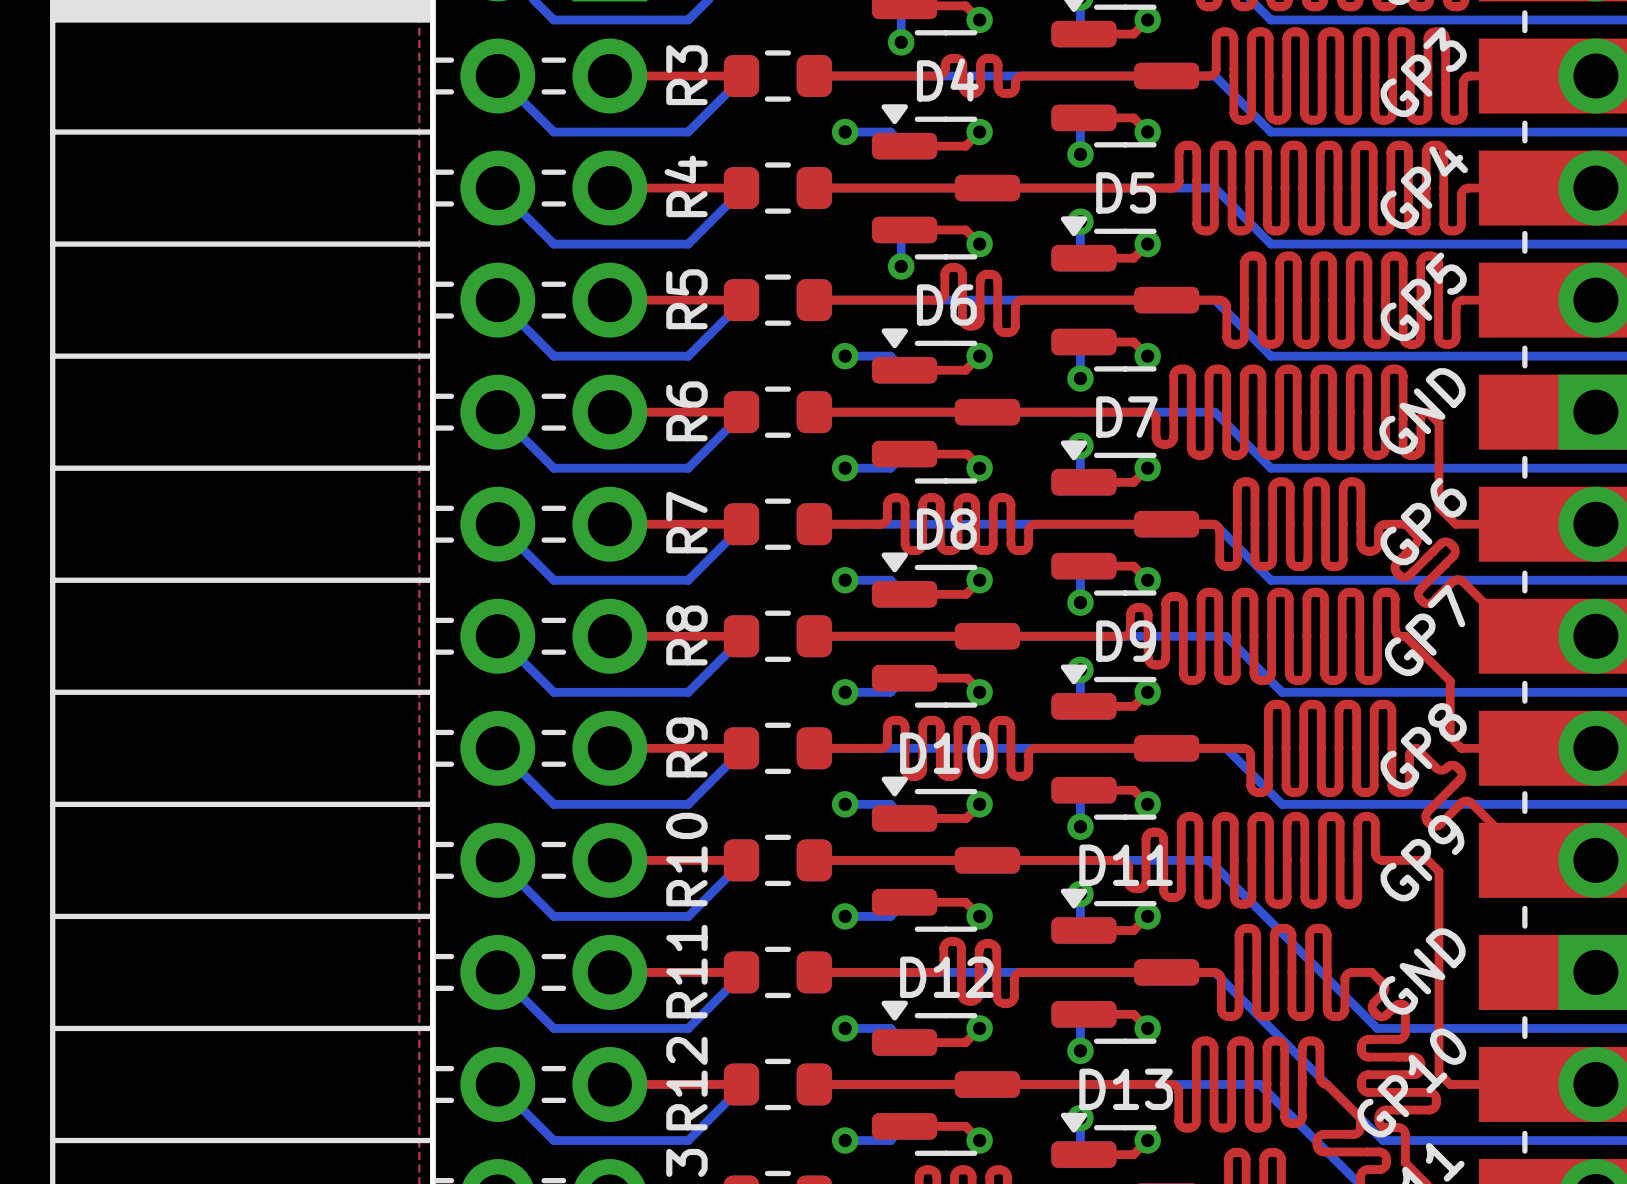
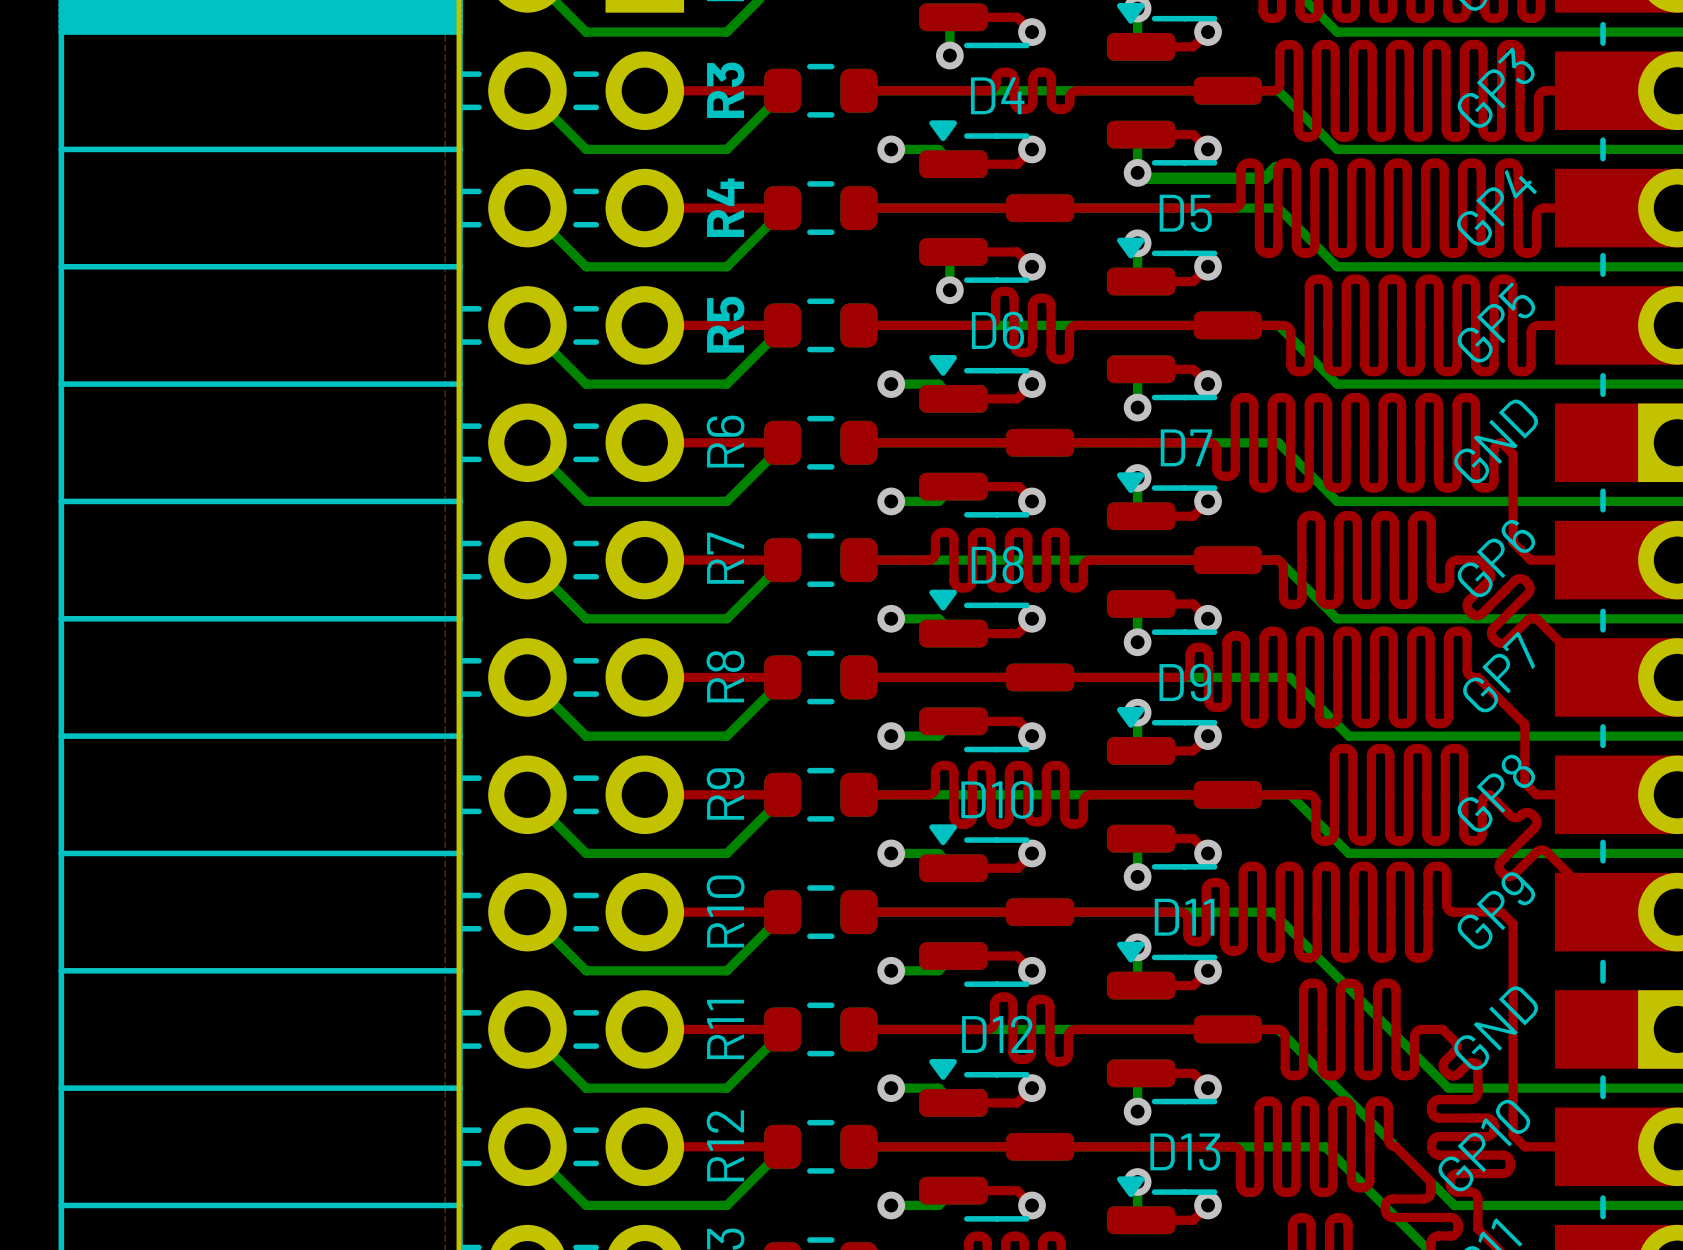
bottom track: none -> (1275, 167) (1264, 178) (1143, 178) (1137, 172)

